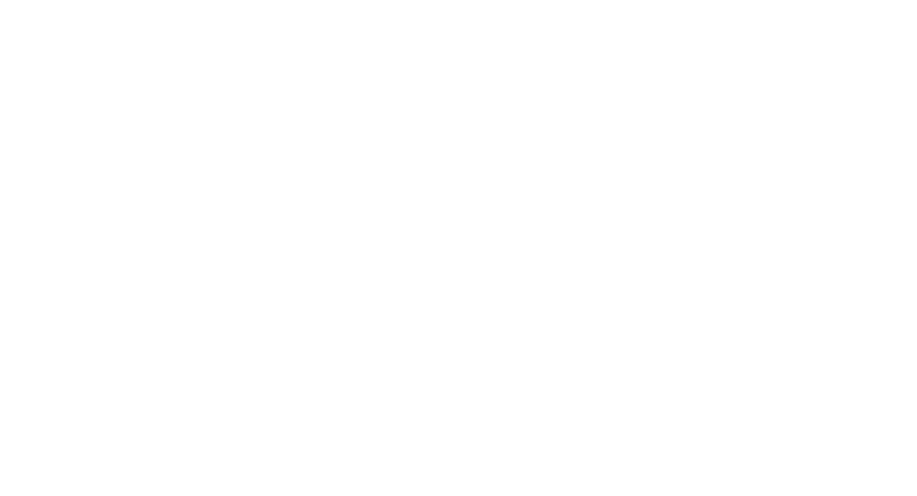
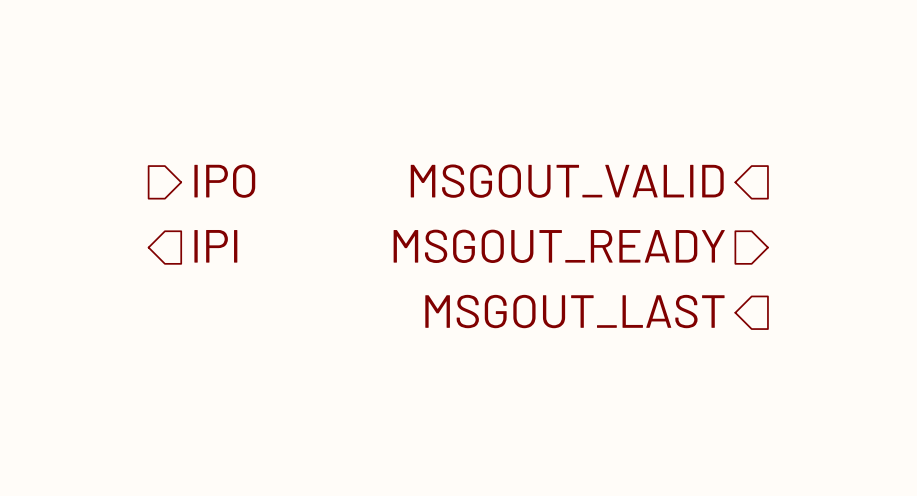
hierarchical label: none -> IPO (224, 181)
hierarchical label: none -> MSGOUT_VALID (567, 181)
hierarchical label: none -> IPI (215, 246)
hierarchical label: none -> MSGOUT_READY (559, 246)
hierarchical label: none -> MSGOUT_LAST (574, 311)

